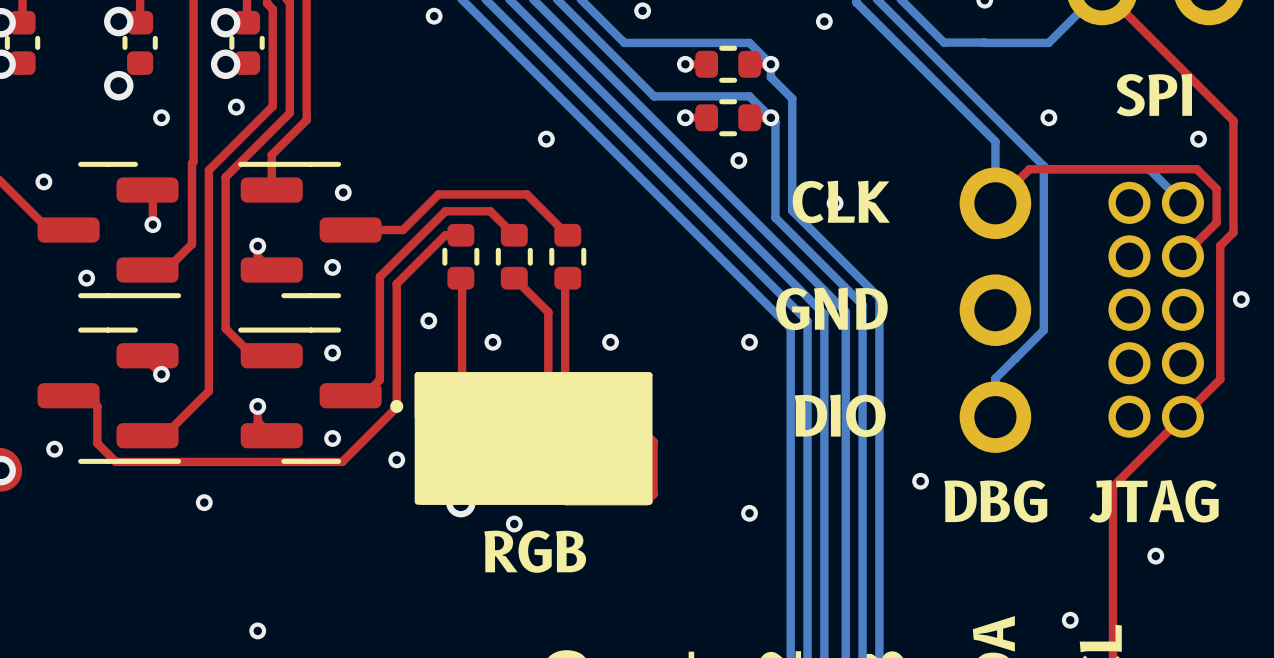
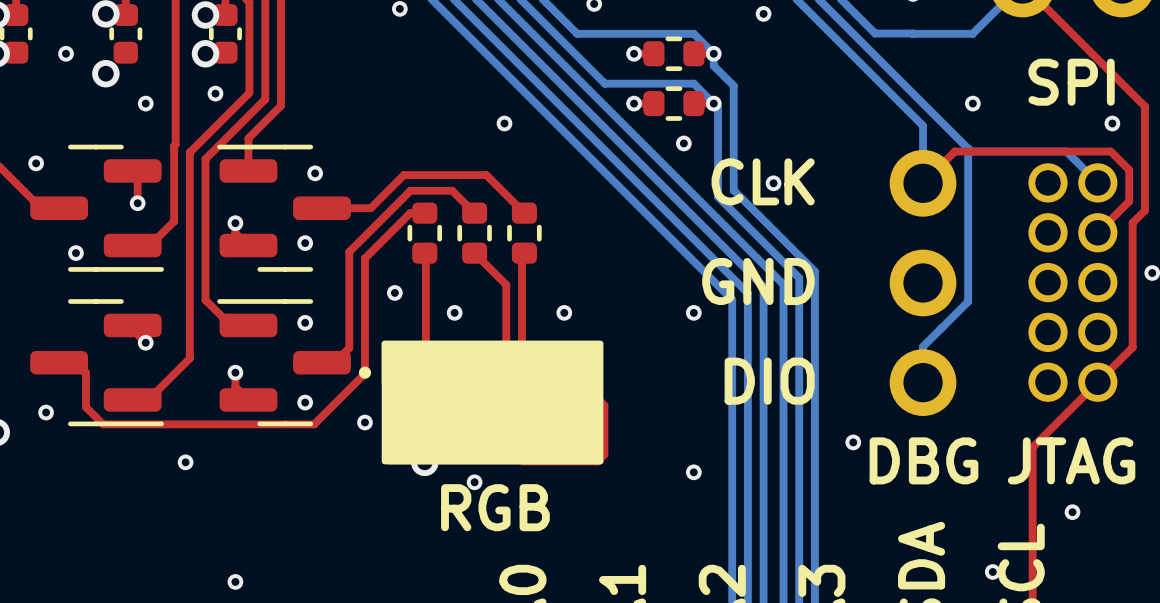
via: none -> (66, 53)

